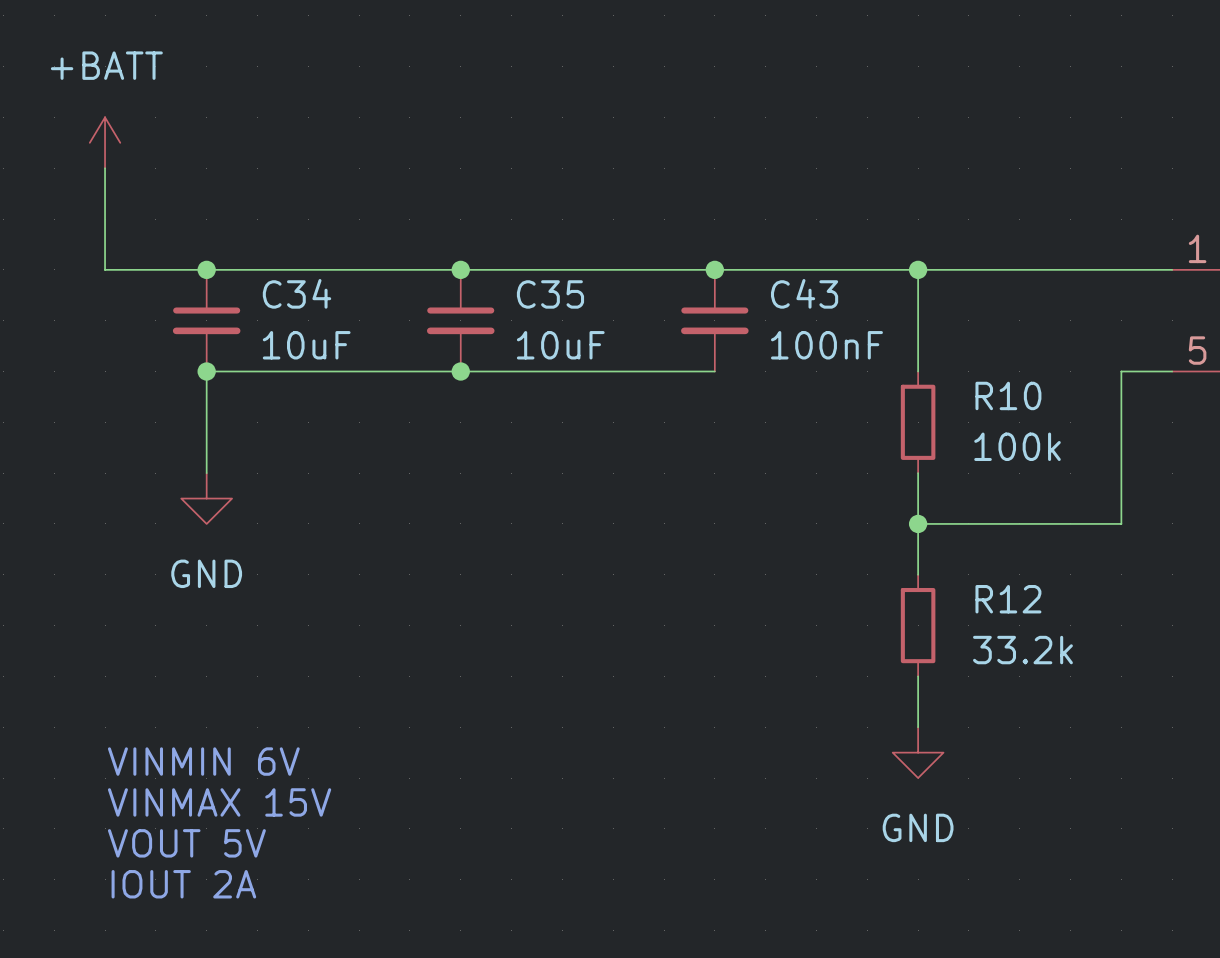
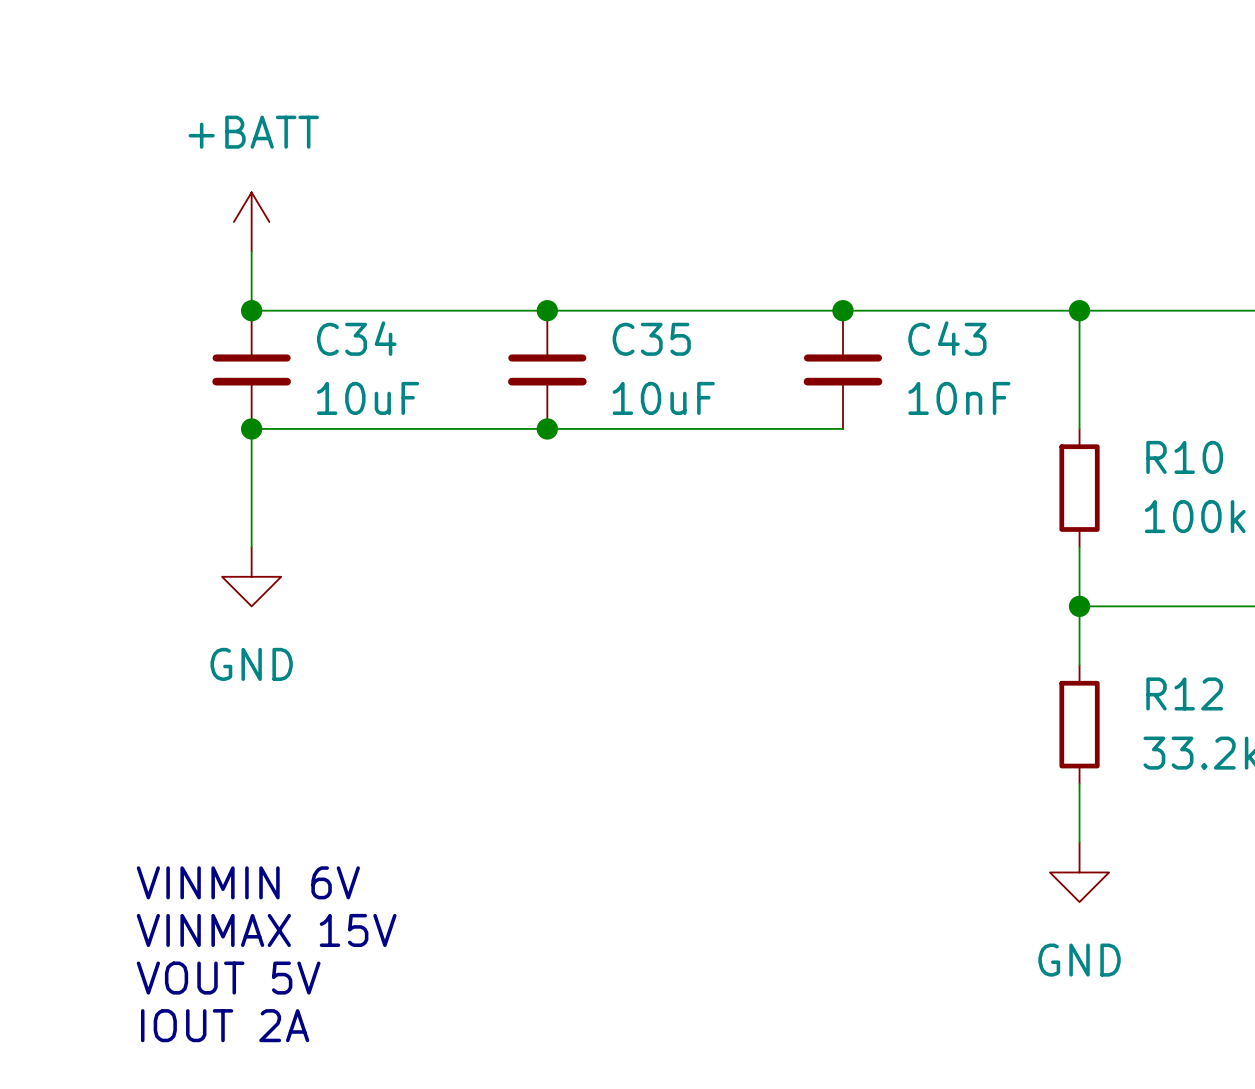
power symbol position: +BATT (105, 142) -> +BATT (251, 221)
wire: (105, 168) (105, 269) (206, 269) -> (251, 251) (251, 310)
C43 value: 100nF (826, 345) -> 10nF (959, 398)

